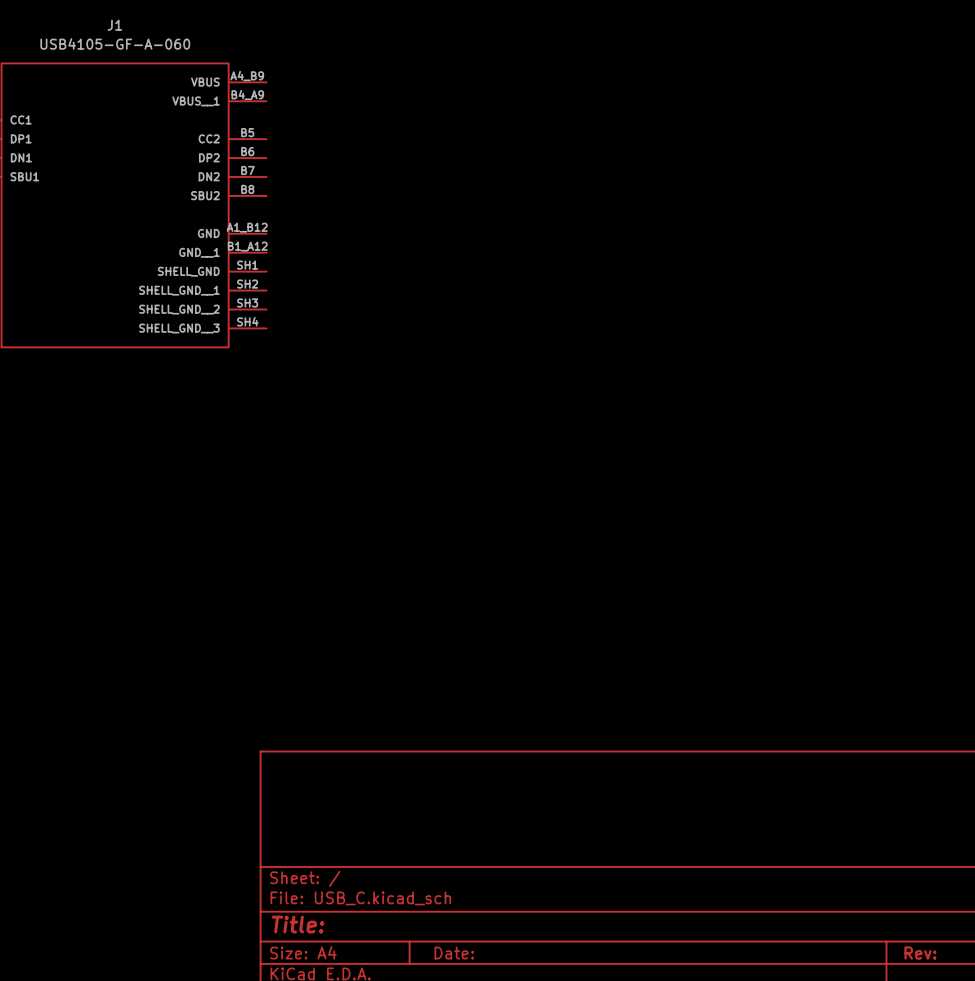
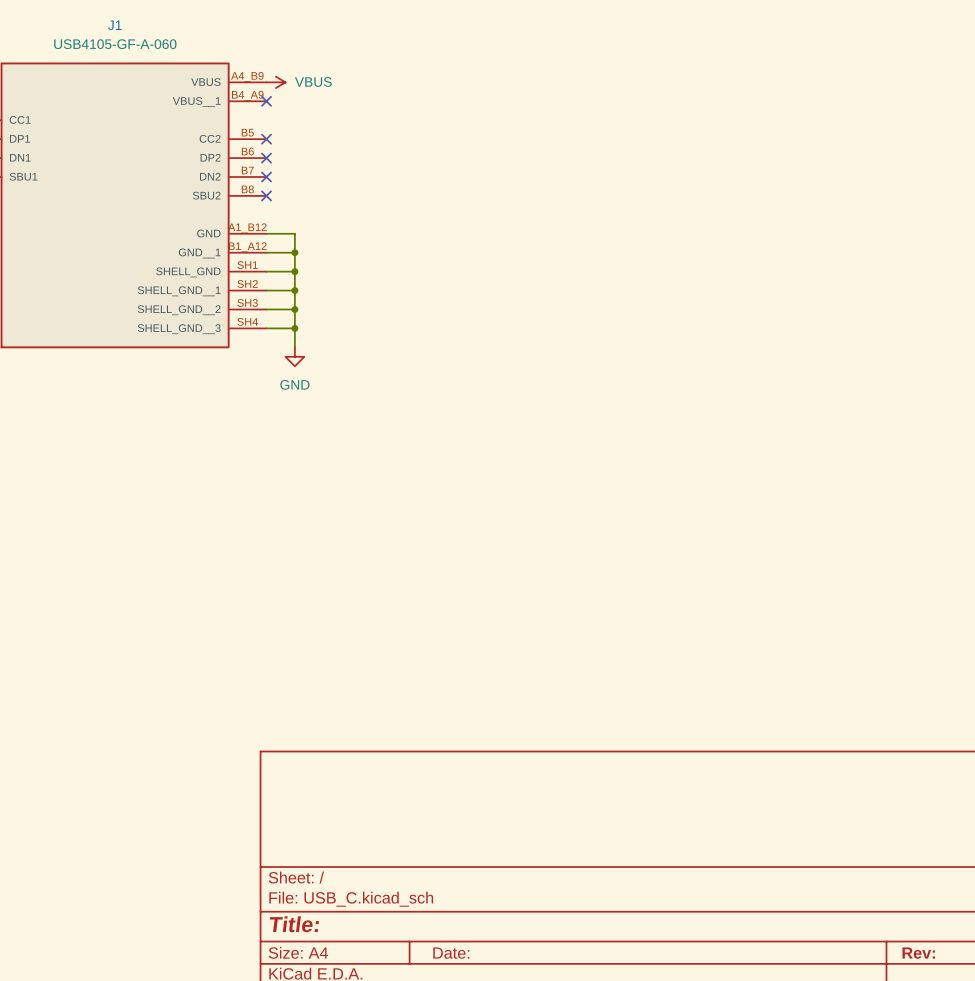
power symbol: none -> VBUS (275, 82)
no-connect mark: none -> (266, 101)
no-connect mark: none -> (266, 139)
no-connect mark: none -> (266, 158)
no-connect mark: none -> (266, 177)
no-connect mark: none -> (266, 195)
wire: none -> (266, 233) (294, 233) (294, 347)
wire: none -> (266, 252) (294, 252)
junction: none -> (294, 252)
wire: none -> (266, 271) (294, 271)
junction: none -> (294, 271)
wire: none -> (266, 290) (294, 290)
junction: none -> (294, 290)
wire: none -> (266, 309) (294, 309)
junction: none -> (294, 309)
wire: none -> (266, 328) (294, 328)
junction: none -> (294, 328)
power symbol: none -> GND (294, 356)

